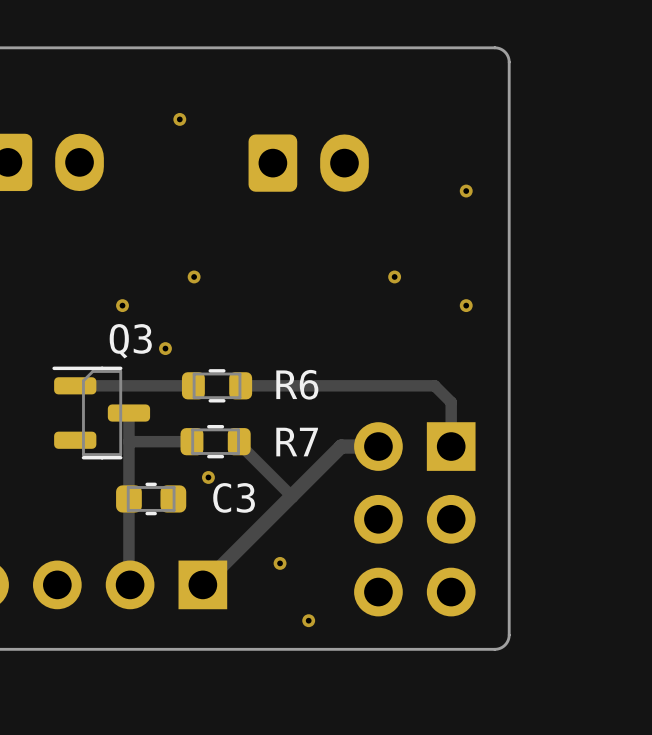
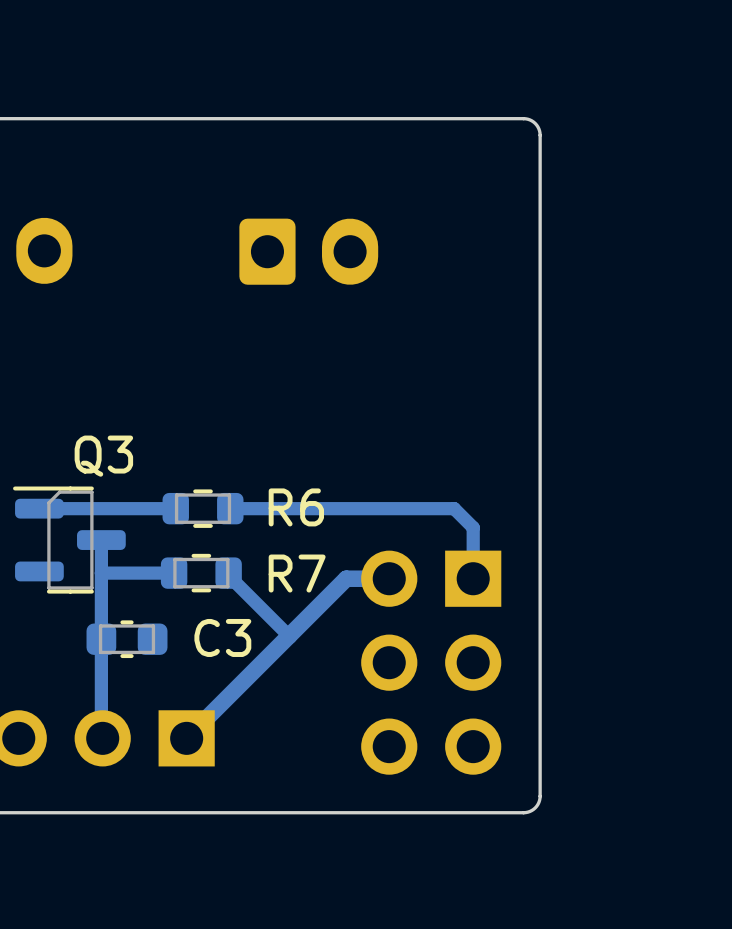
via: (179, 119) -> none
via: (466, 191) -> none
via: (194, 276) -> none
via: (394, 276) -> none
via: (122, 305) -> none
via: (466, 305) -> none
via: (165, 348) -> none
via: (208, 477) -> none
via: (280, 563) -> none
via: (308, 620) -> none

